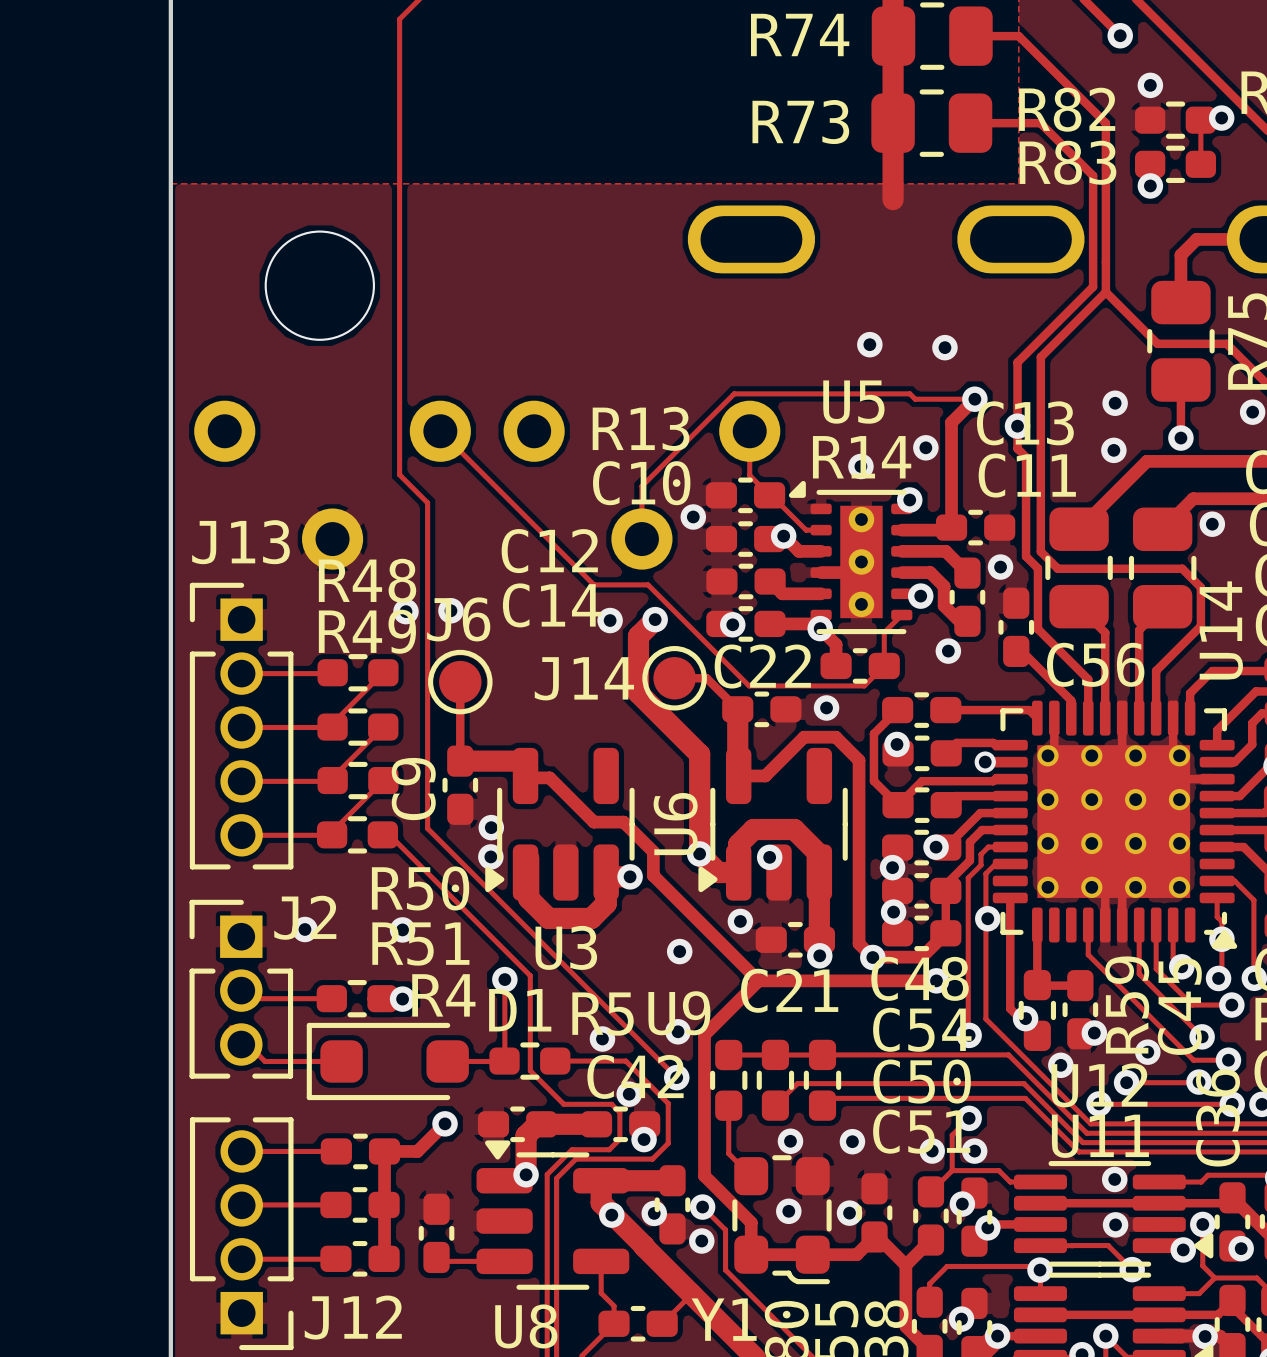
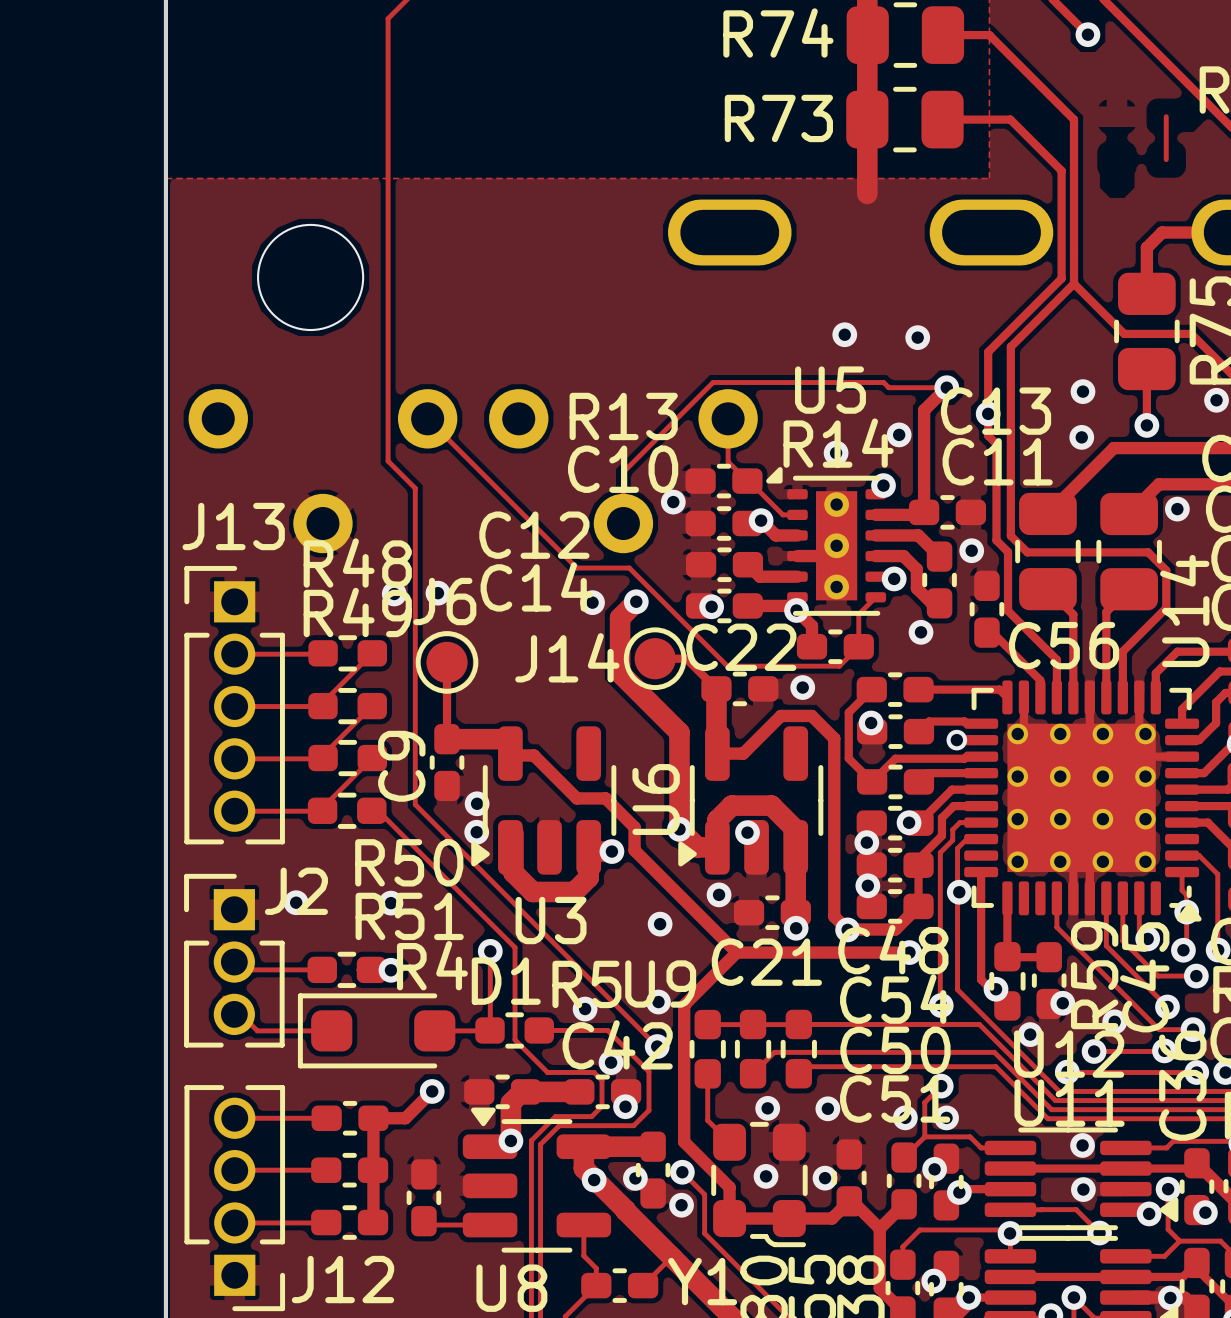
via: (1150, 85) -> none
via: (1221, 118) -> none
R82: (1175, 120) -> none
R83: (1175, 164) -> none
via: (1150, 185) -> none

